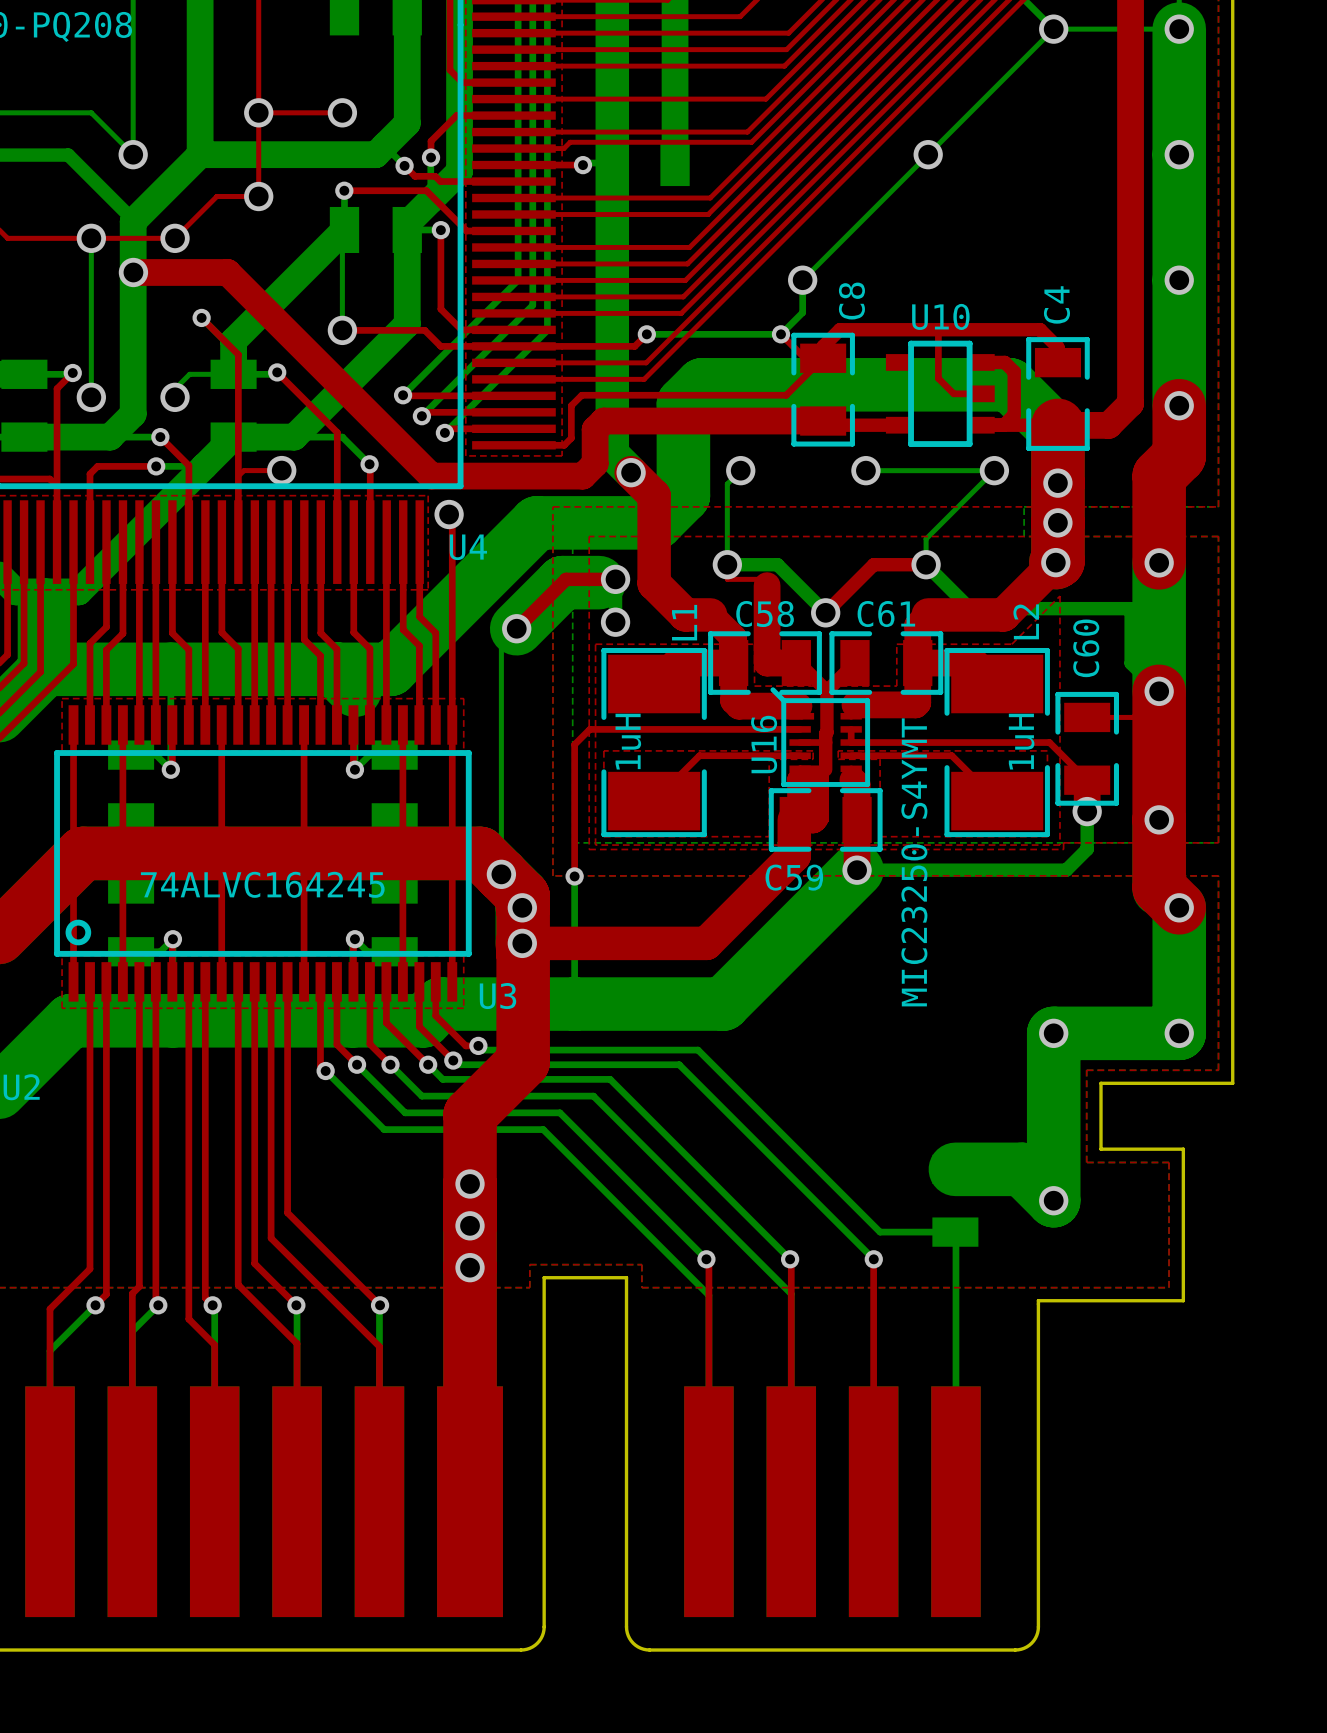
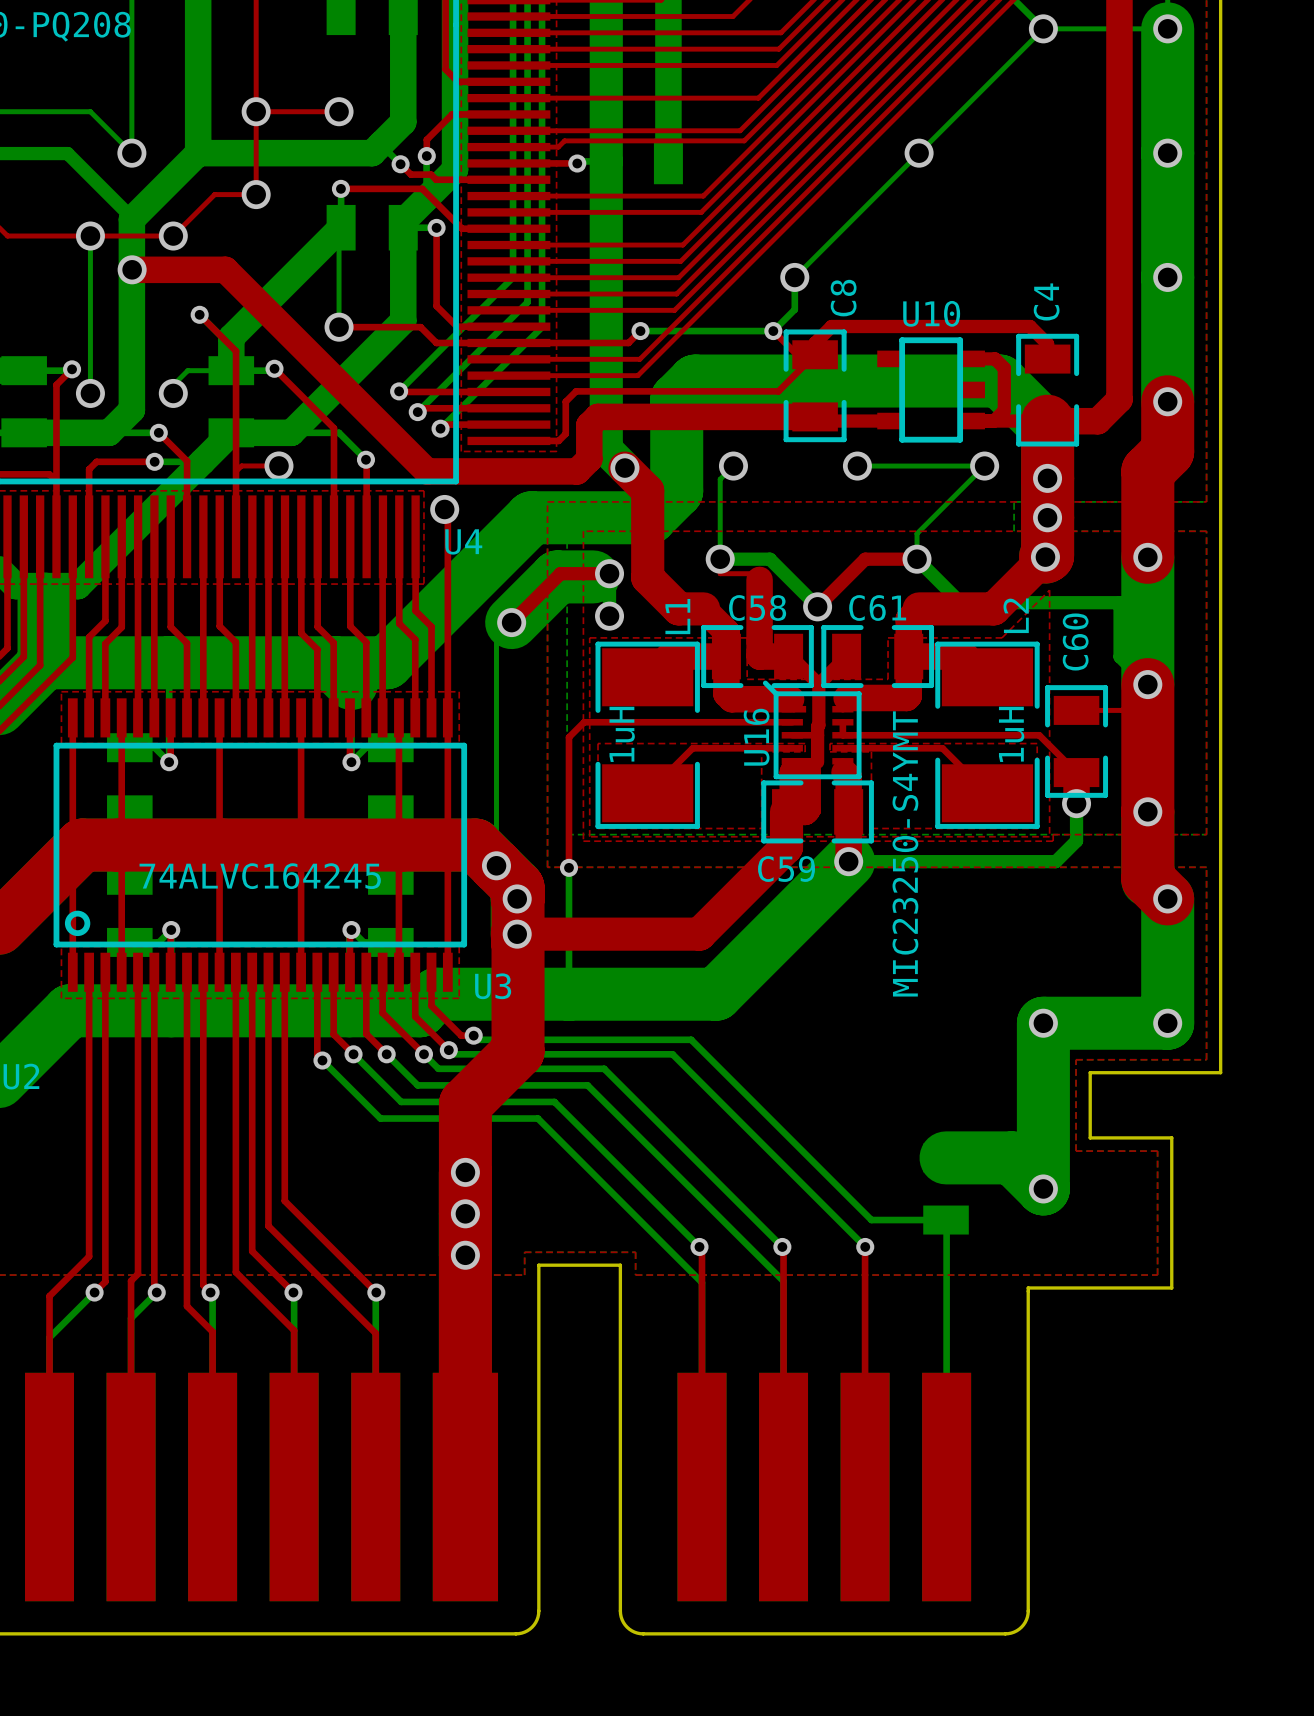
top track: (938, 329) (938, 378) (953, 393) (982, 393) -> none

